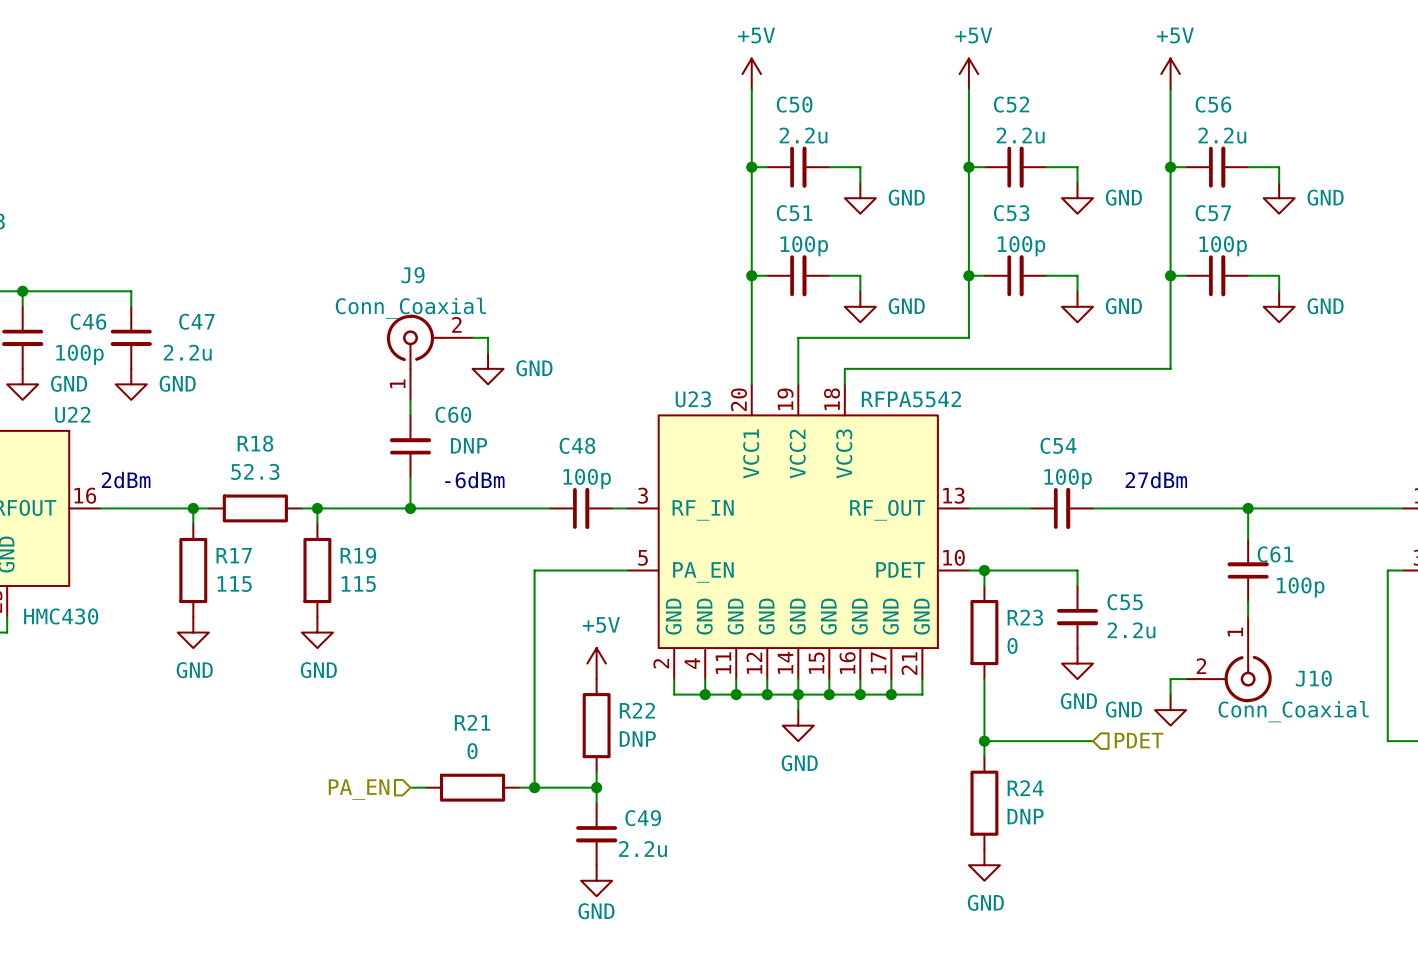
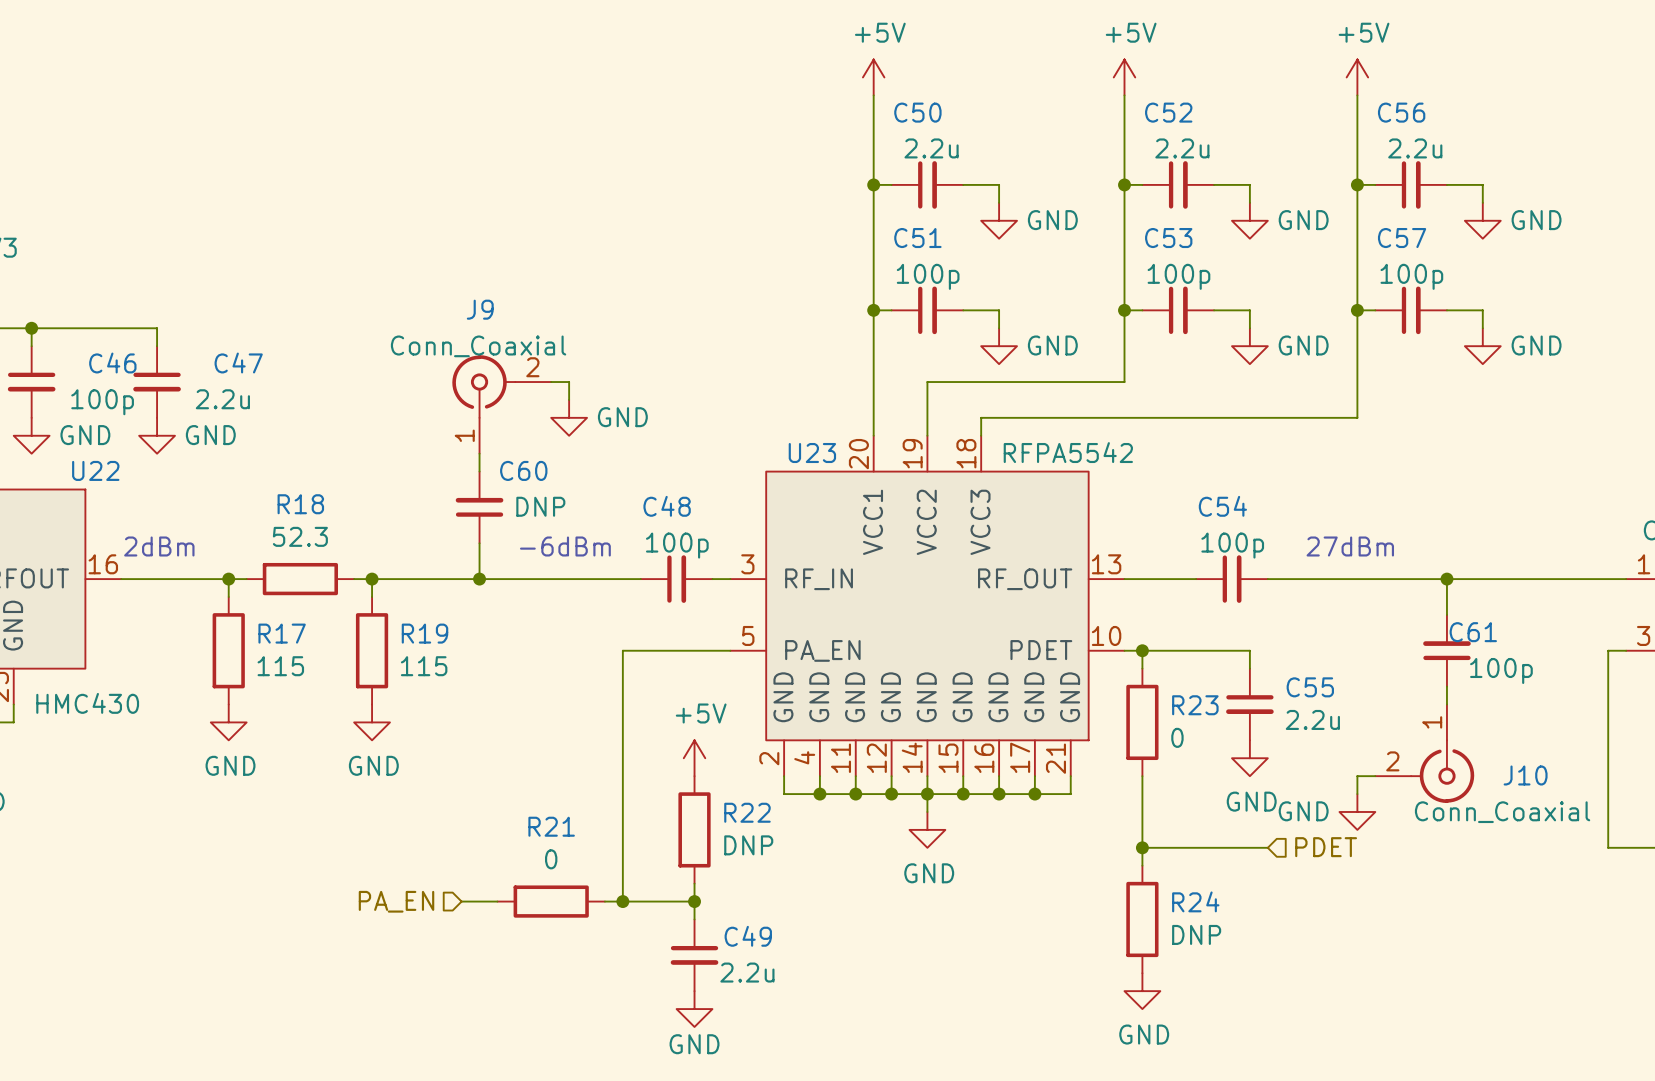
wire: none -> (461, 901) (479, 901)
hierarchical label position: PA_EN (359, 789) -> PA_EN (396, 901)

